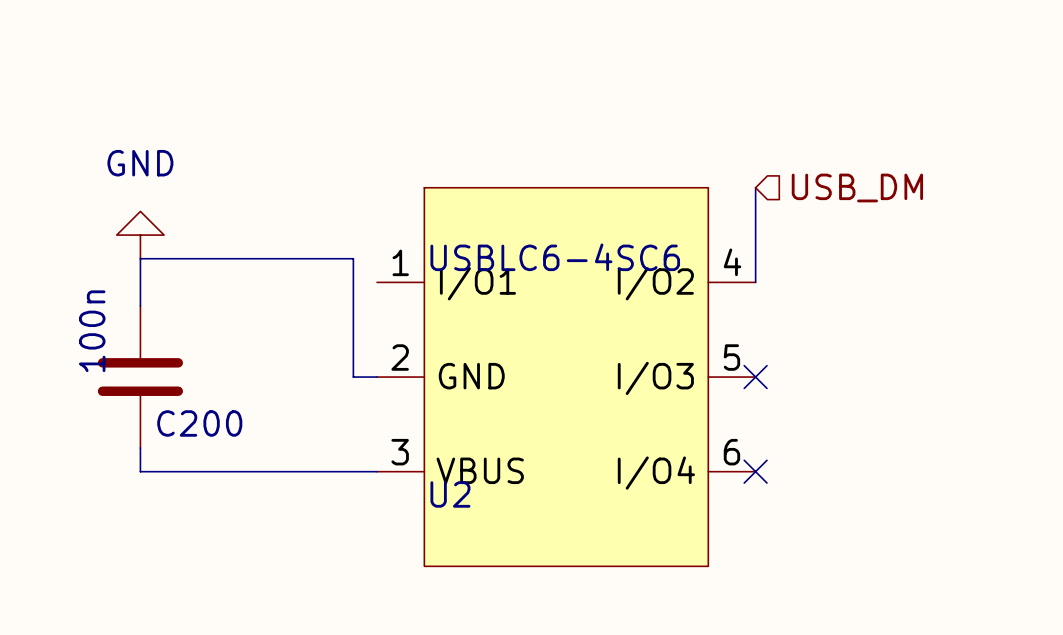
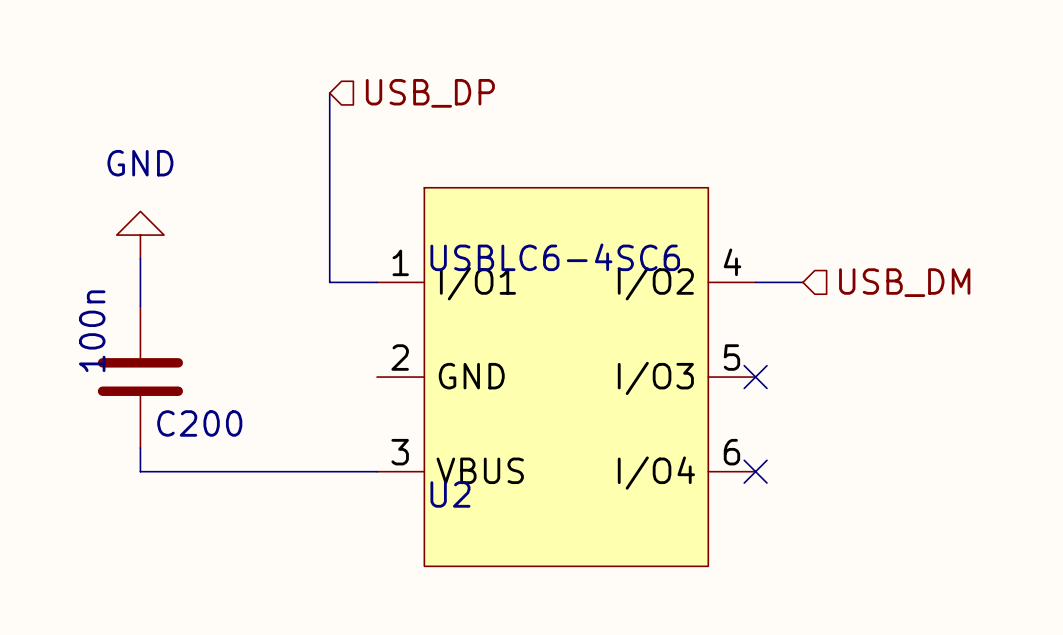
wire: none -> (329, 93) (329, 282) (377, 282)
hierarchical label: none -> USB_DP (430, 93)
wire: (755, 187) (755, 282) -> (802, 282) (755, 282)
hierarchical label position: USB_DM (857, 187) -> USB_DM (904, 282)
wire: (140, 258) (353, 258) (353, 377) (377, 377) -> none

